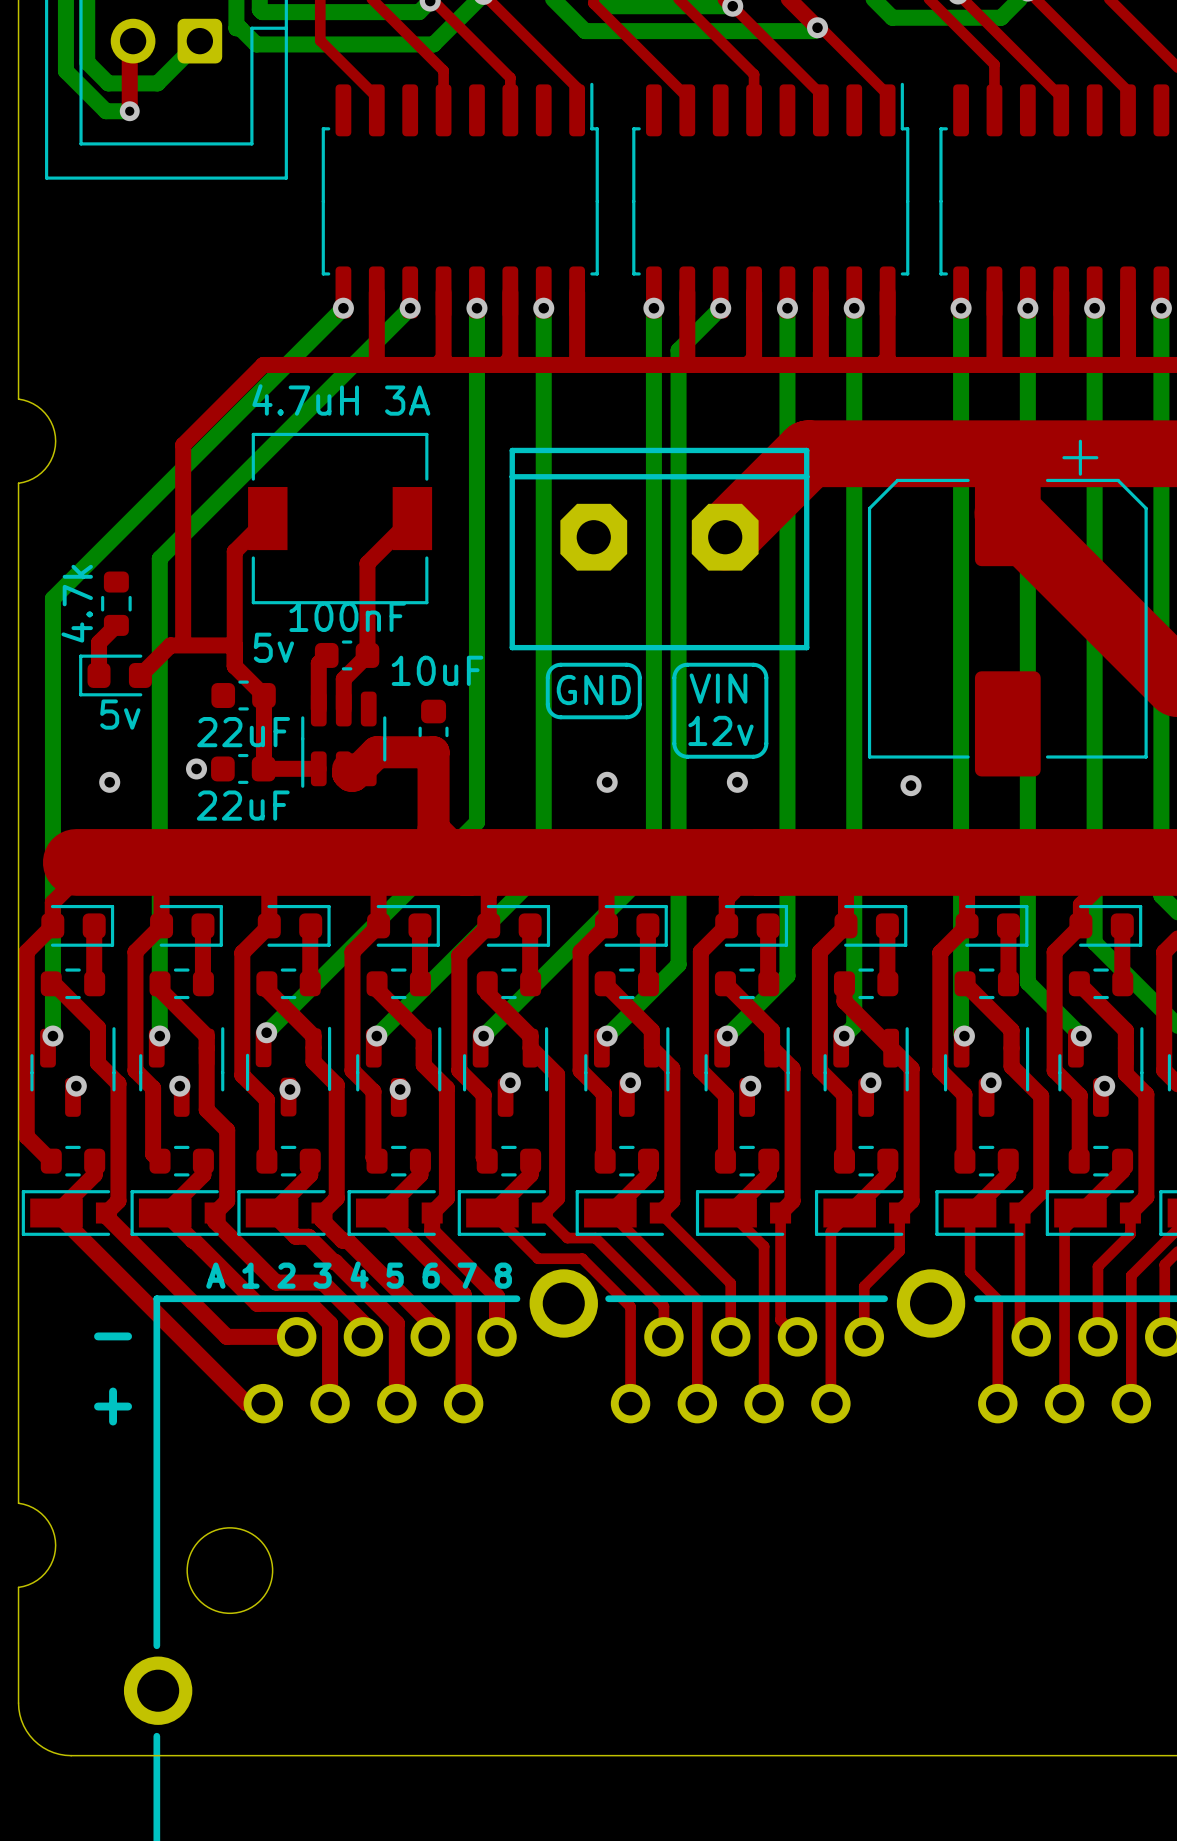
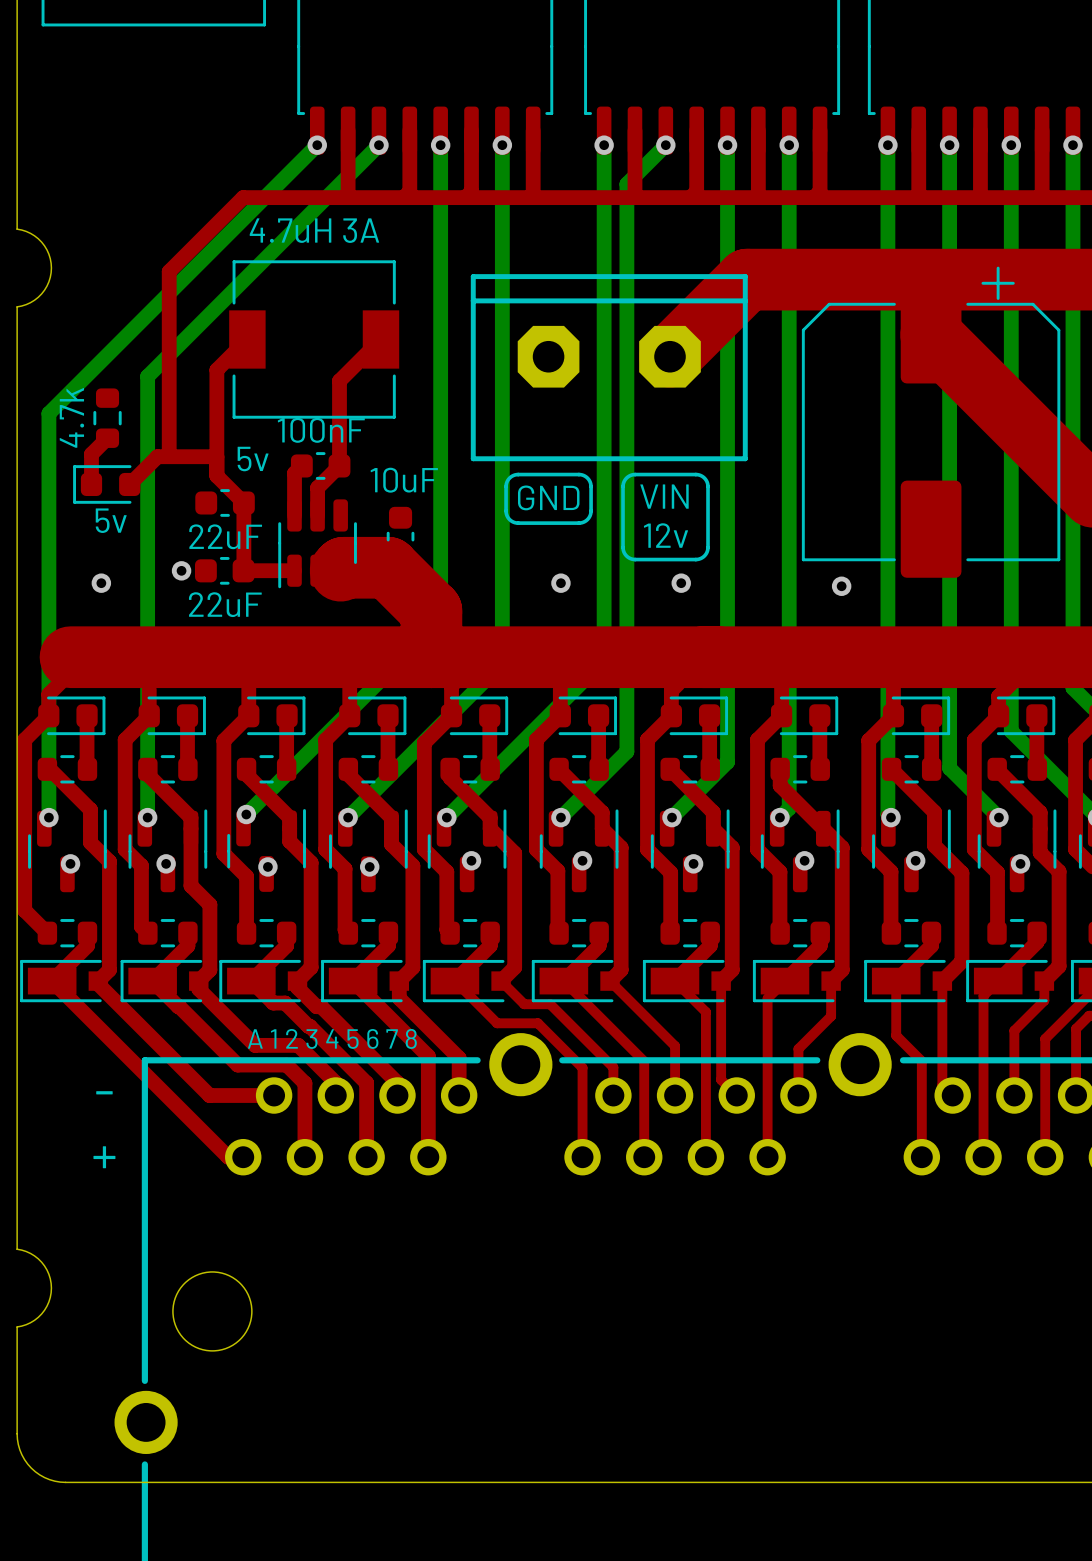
top track: (348, 768) (348, 773) (353, 775) (376, 752) (433, 752) (433, 829) (466, 862) -> (340, 570) (343, 567) (388, 567) (431, 610) (431, 657)

